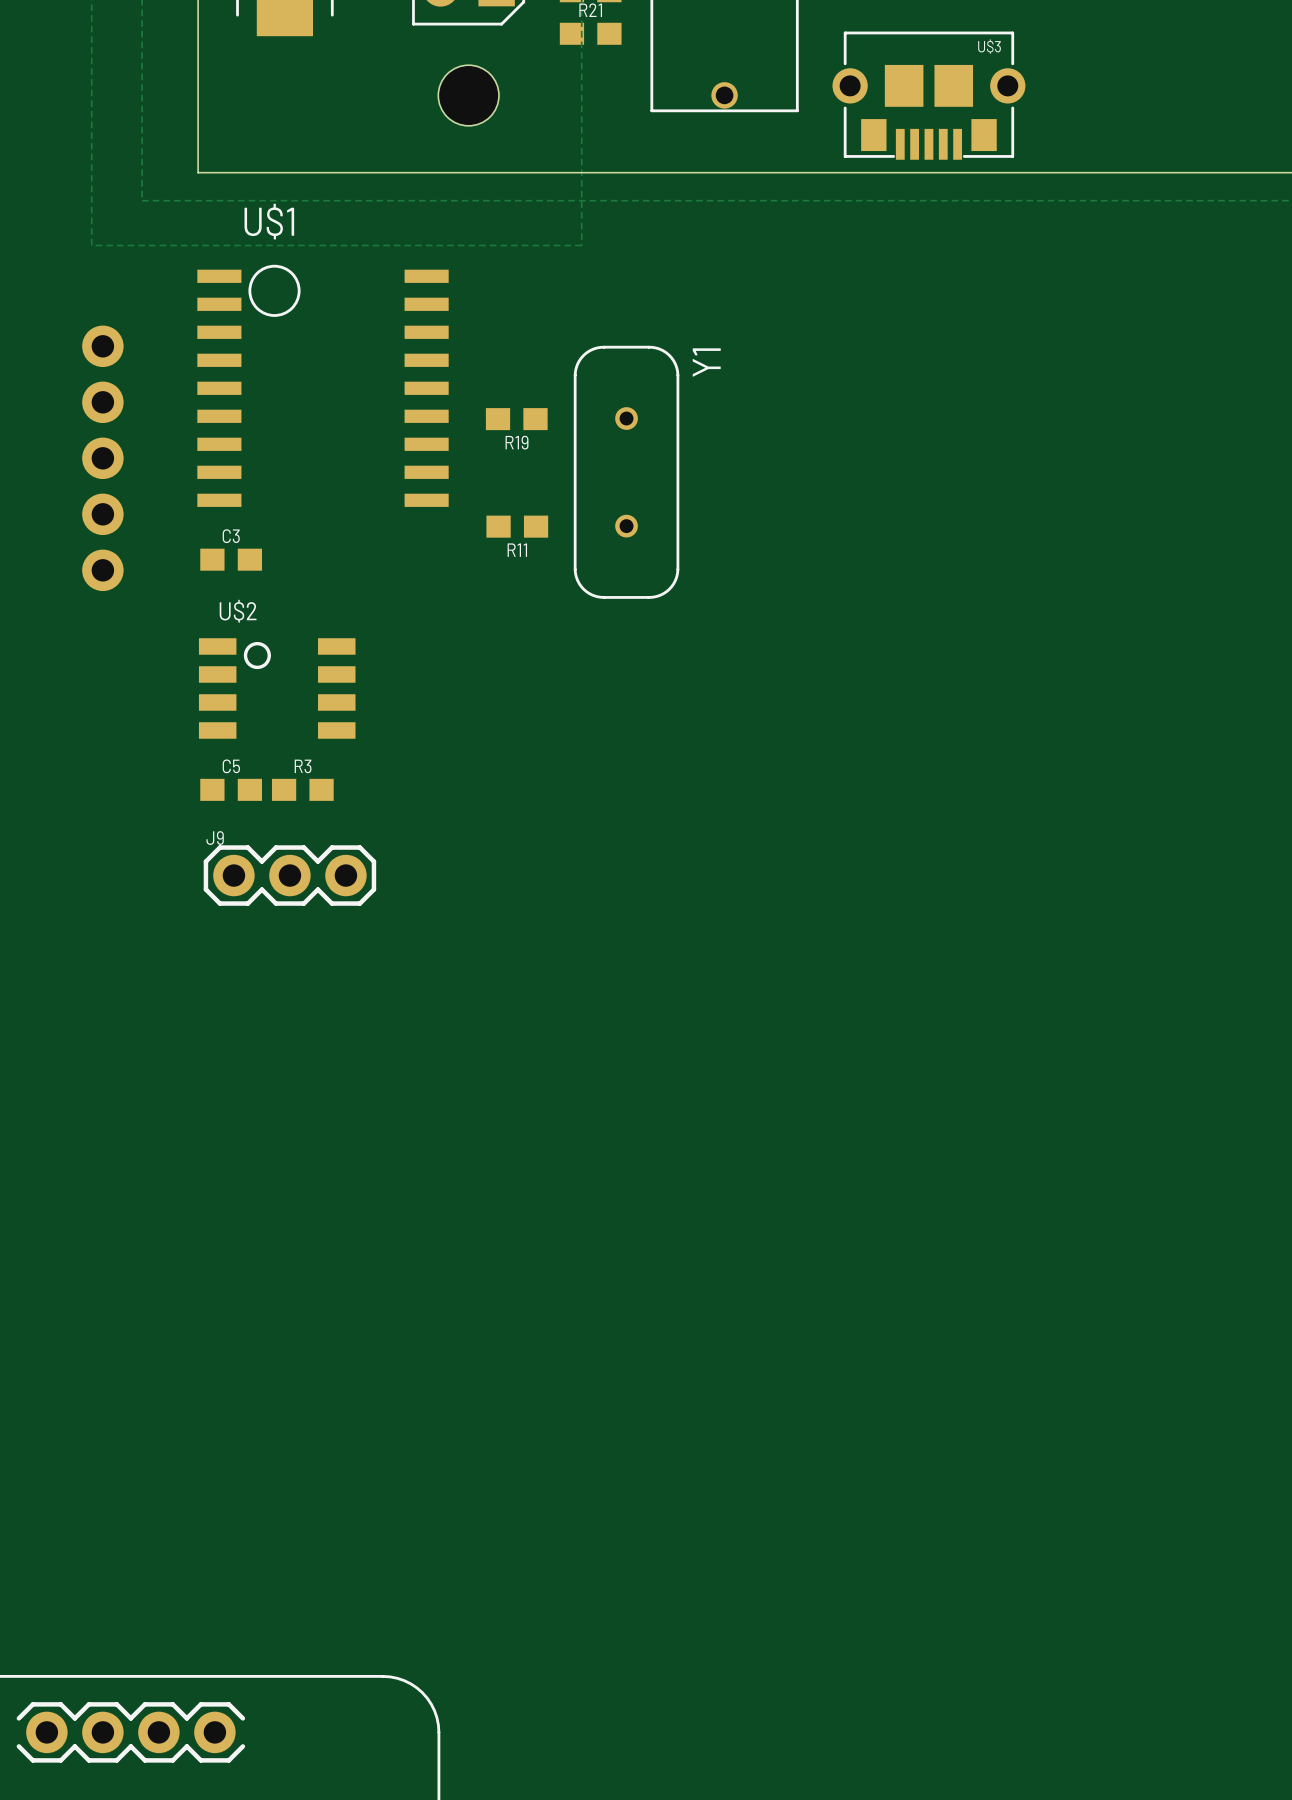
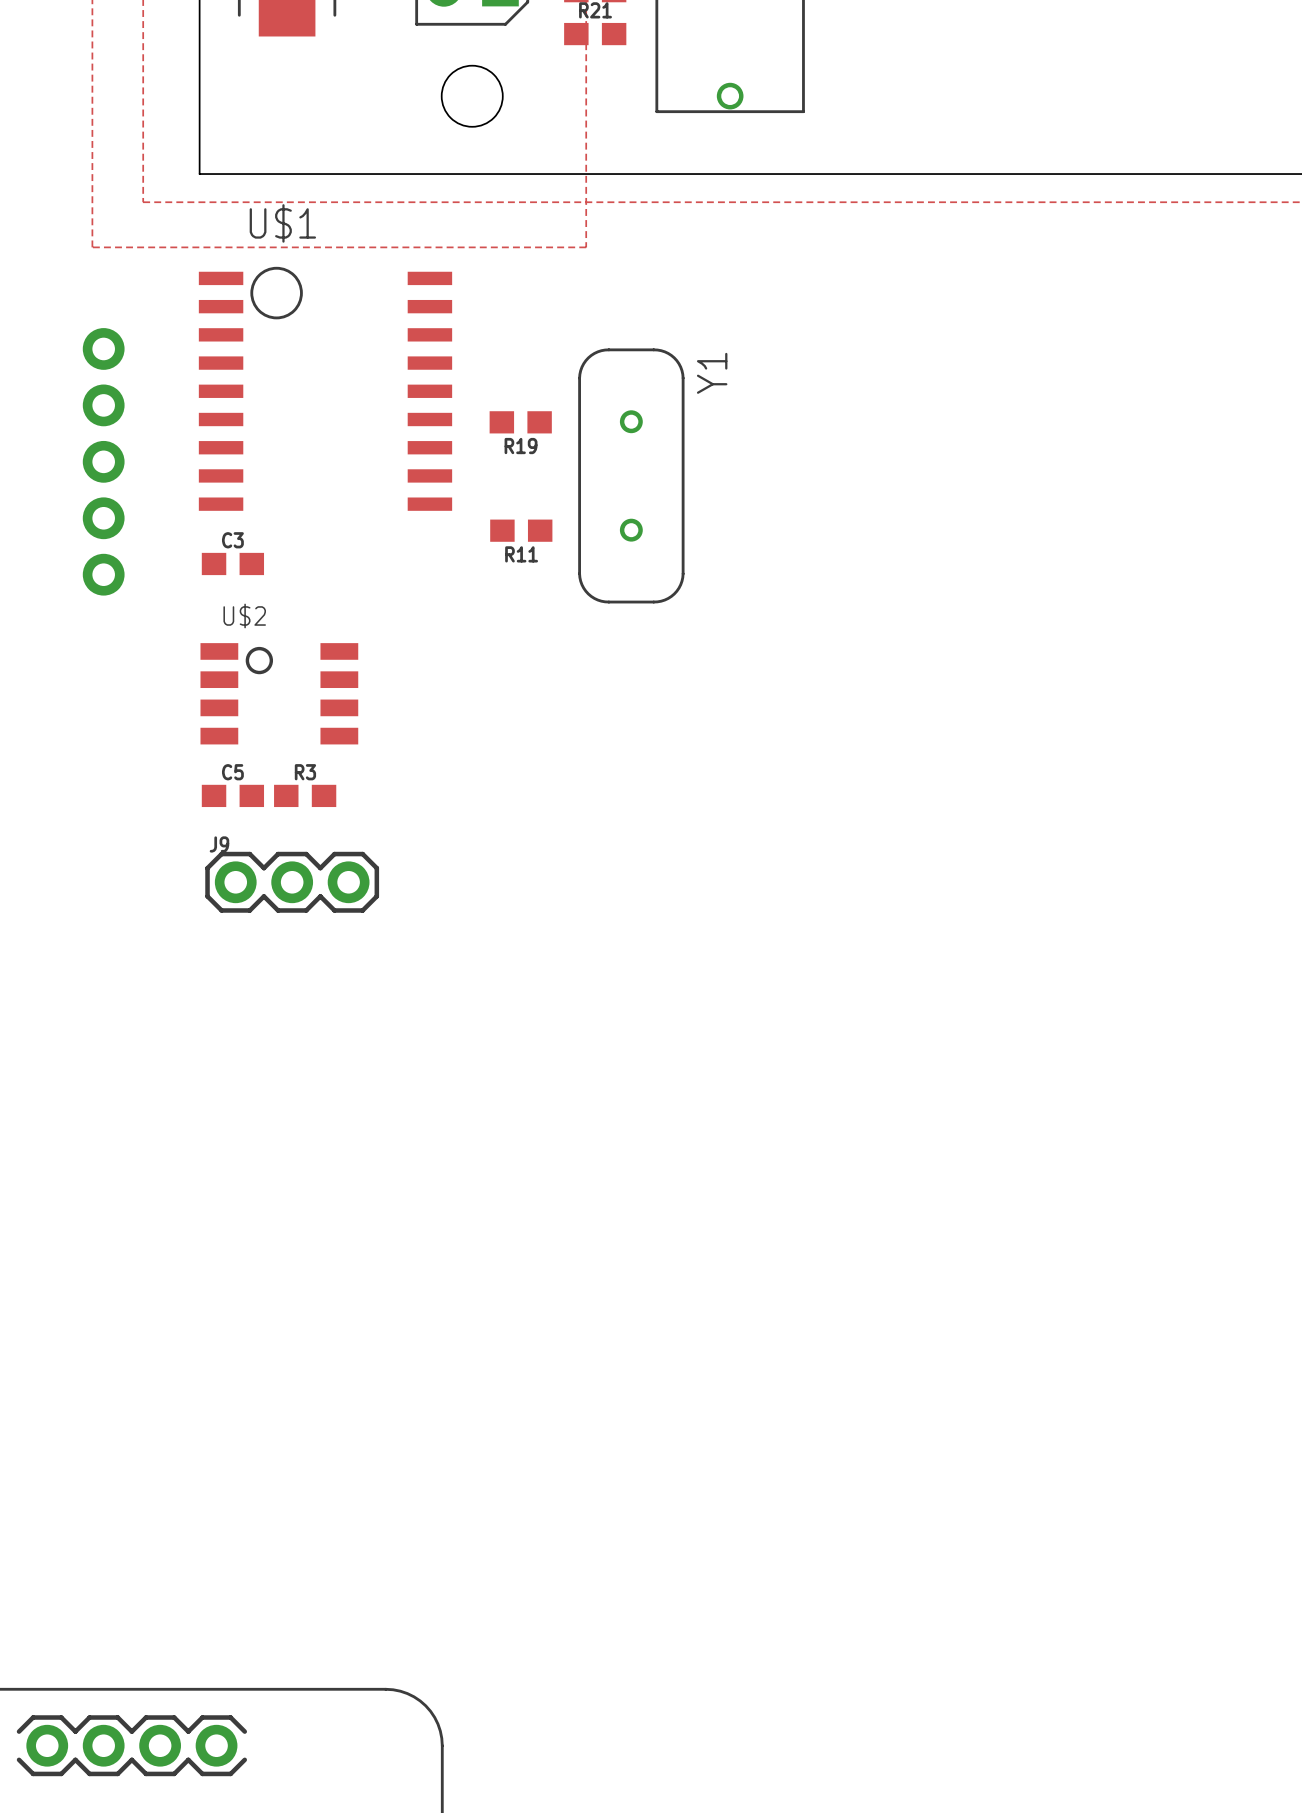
U$3: (928, 95) -> none

